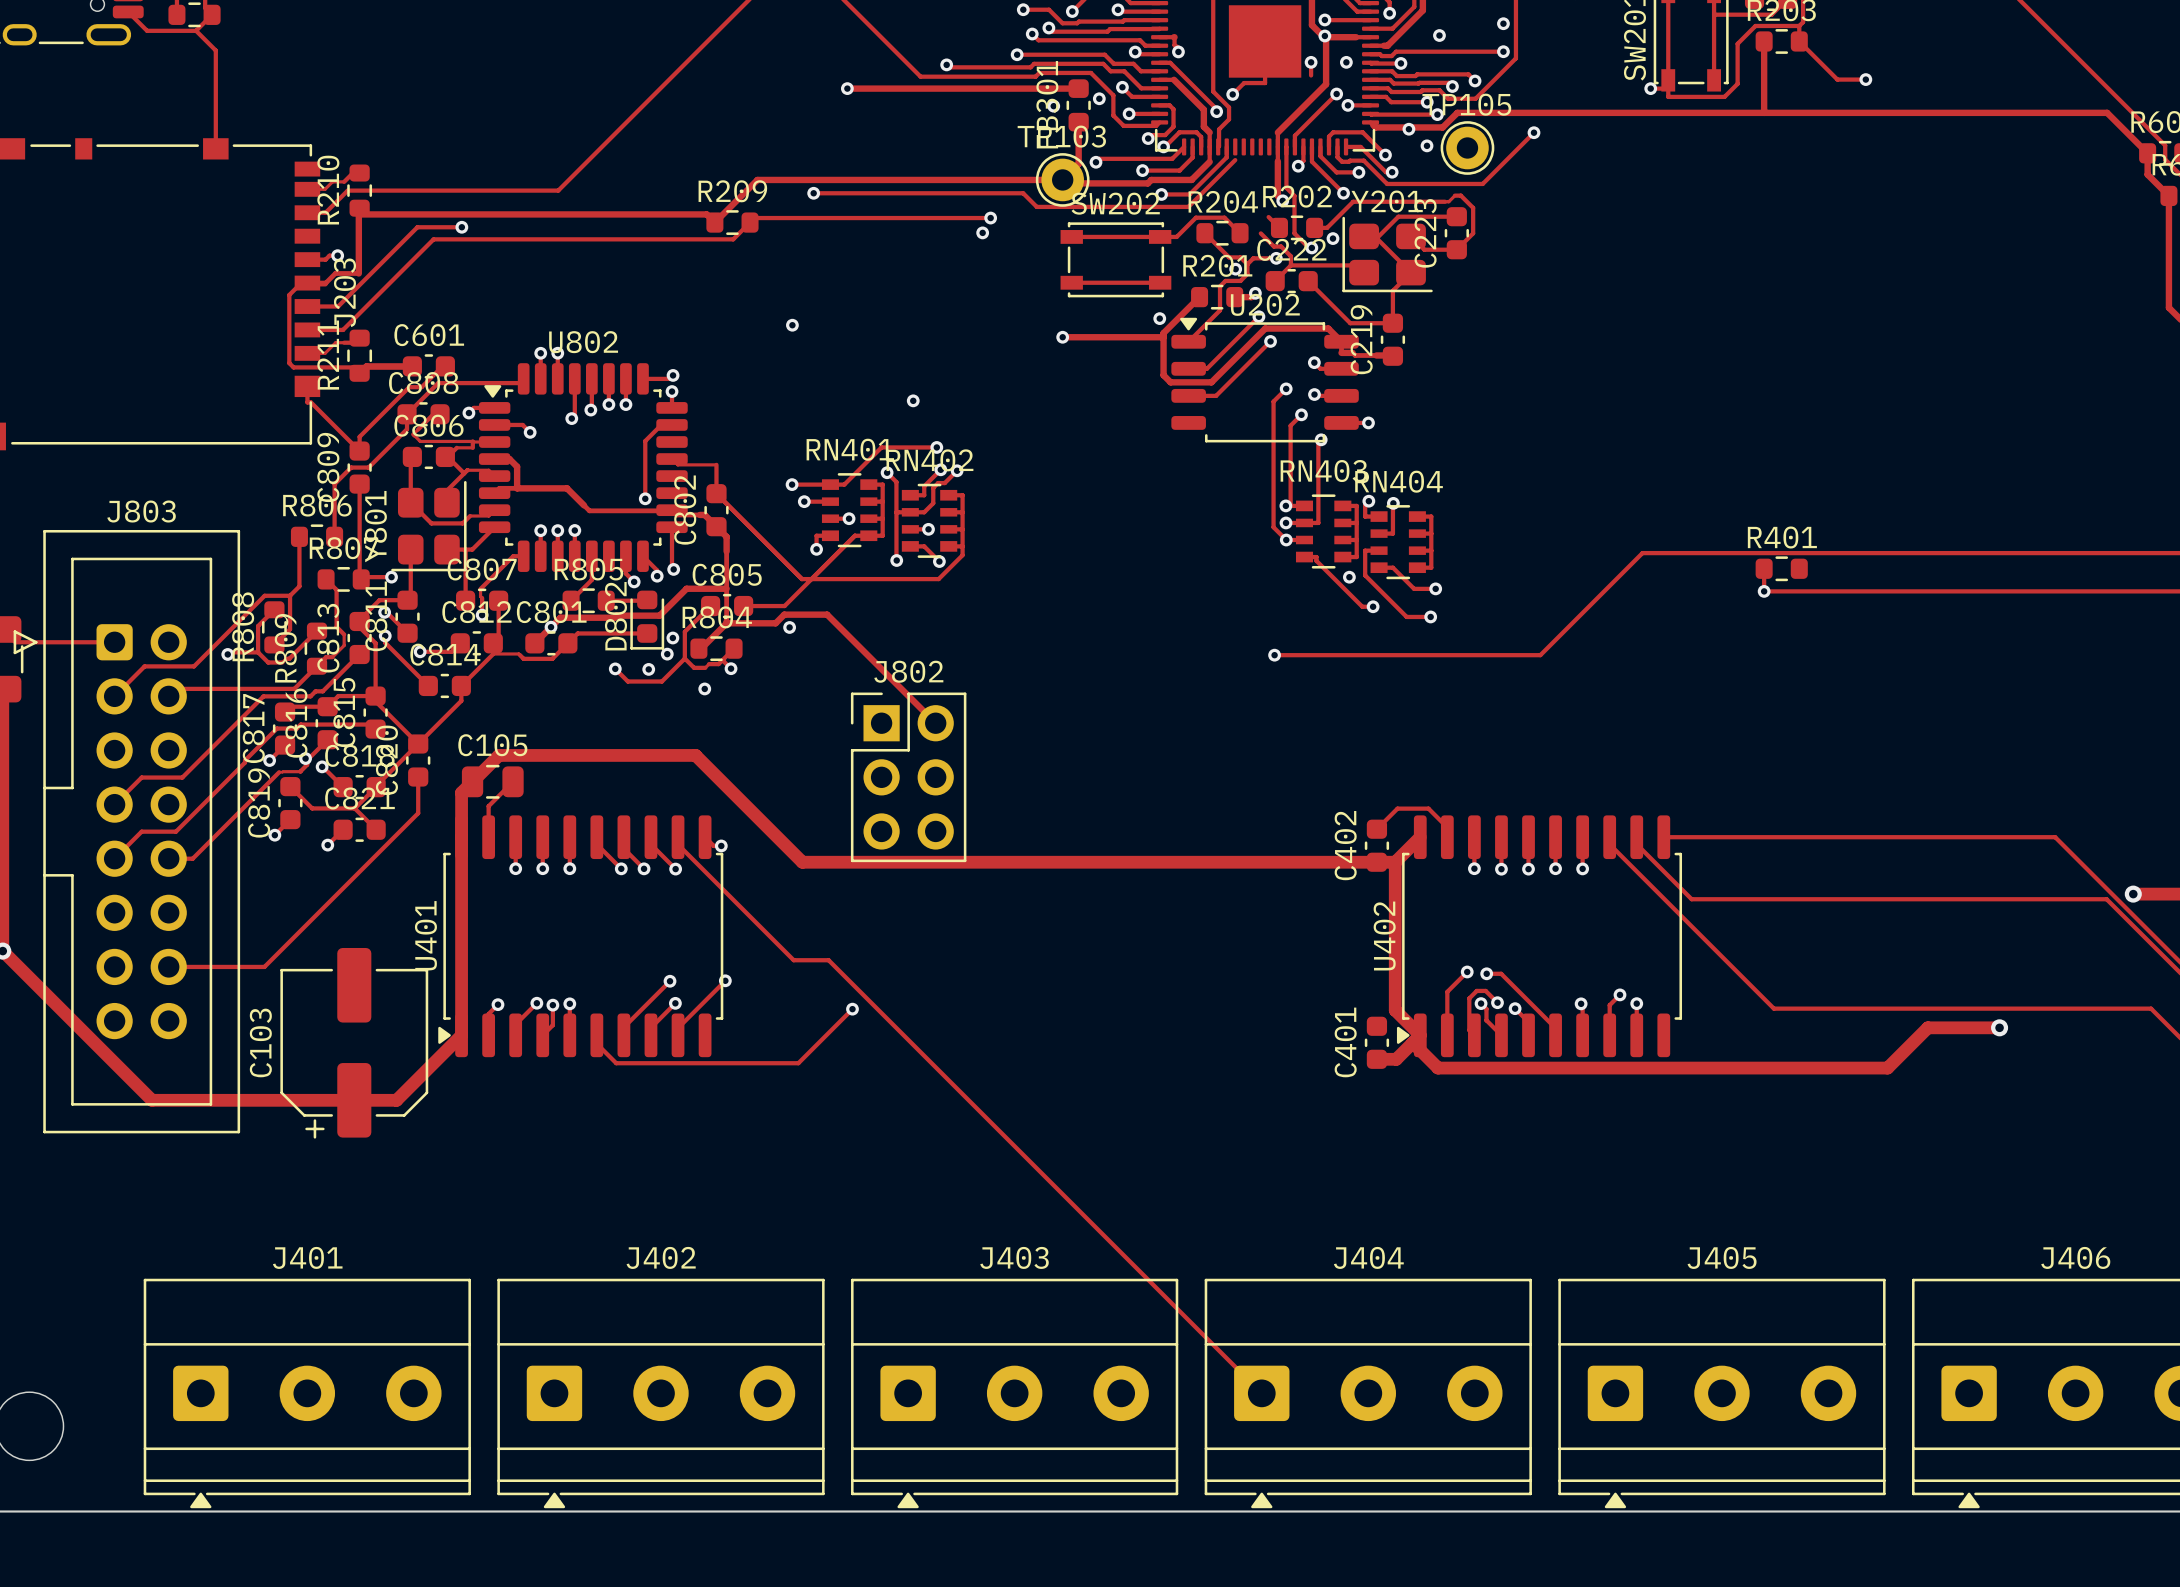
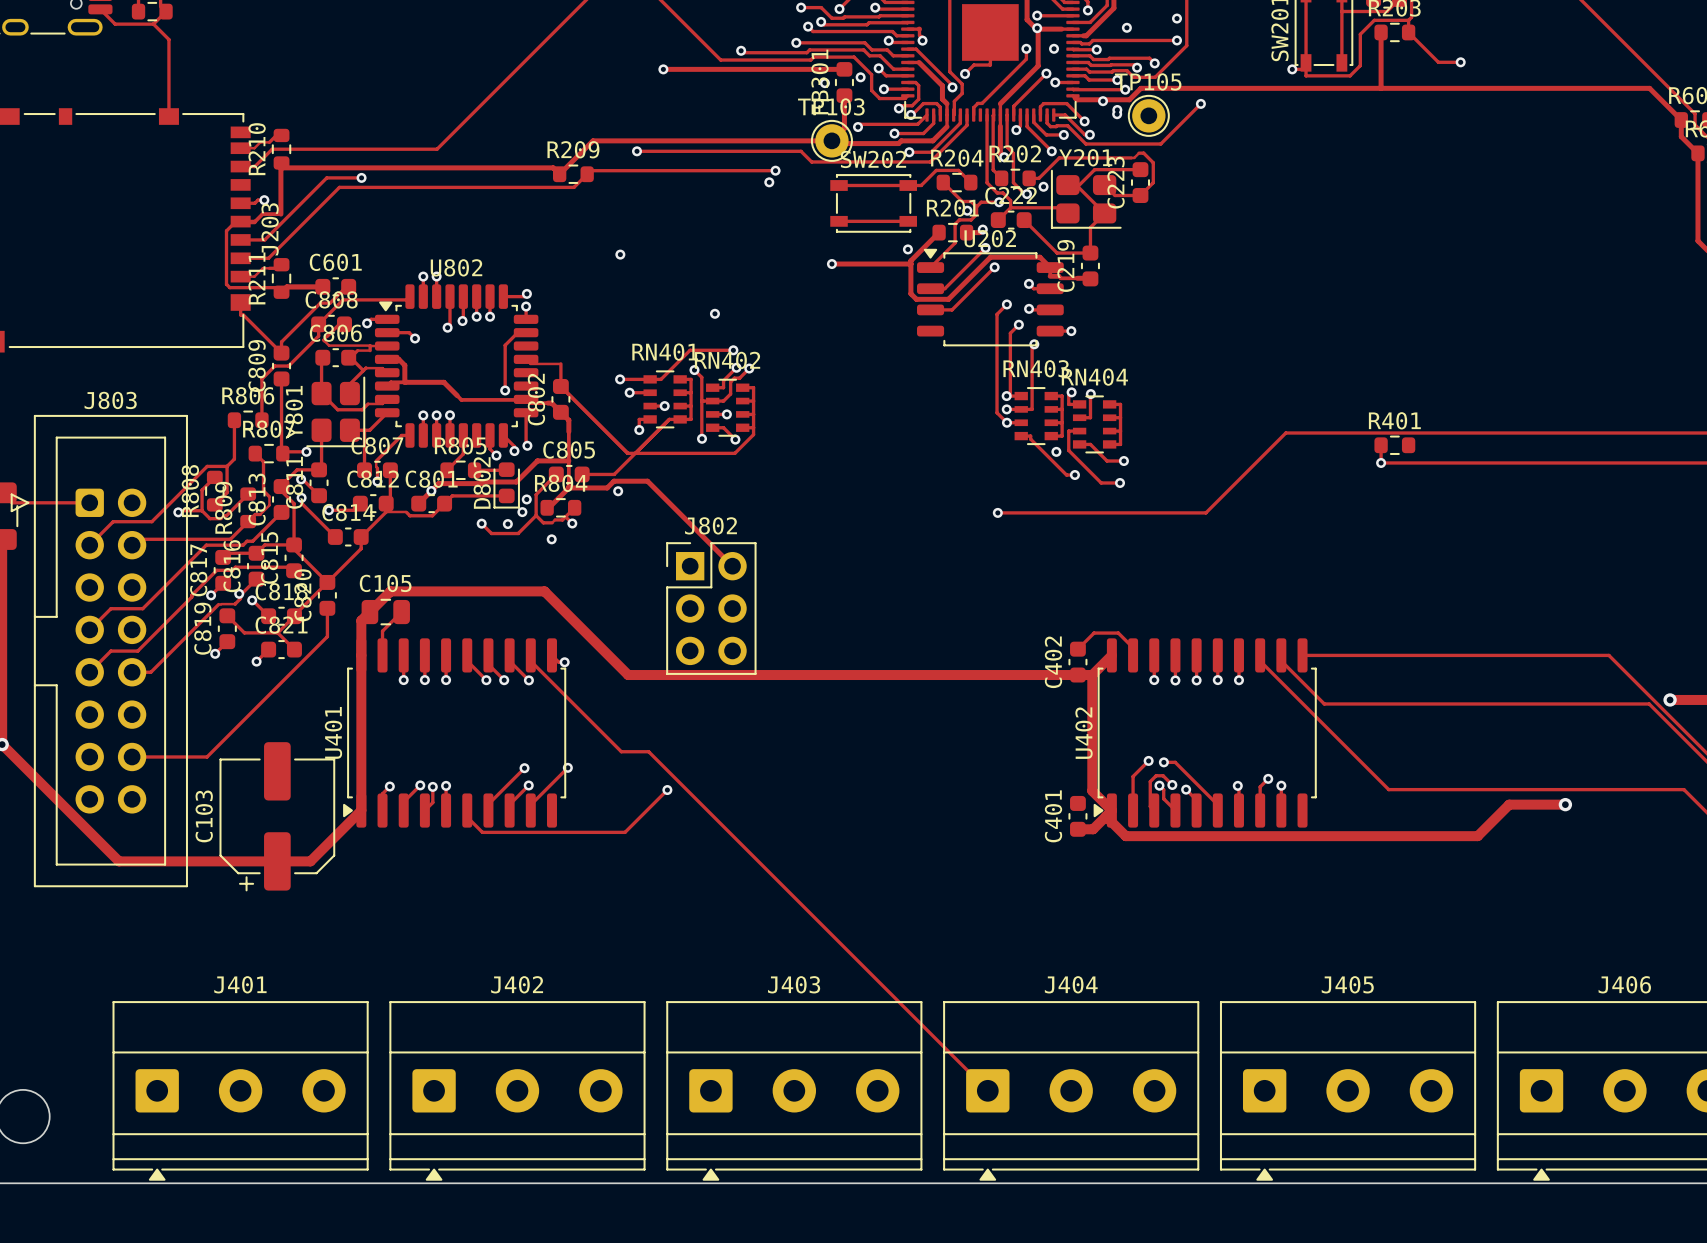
track: none -> (1026, 59) (982, 103) (977, 103) (973, 107) (973, 115)
via: none -> (1117, 109)
track: none -> (967, 115) (967, 125)
track: none -> (987, 115) (987, 182)
track: none -> (993, 115) (993, 169)

